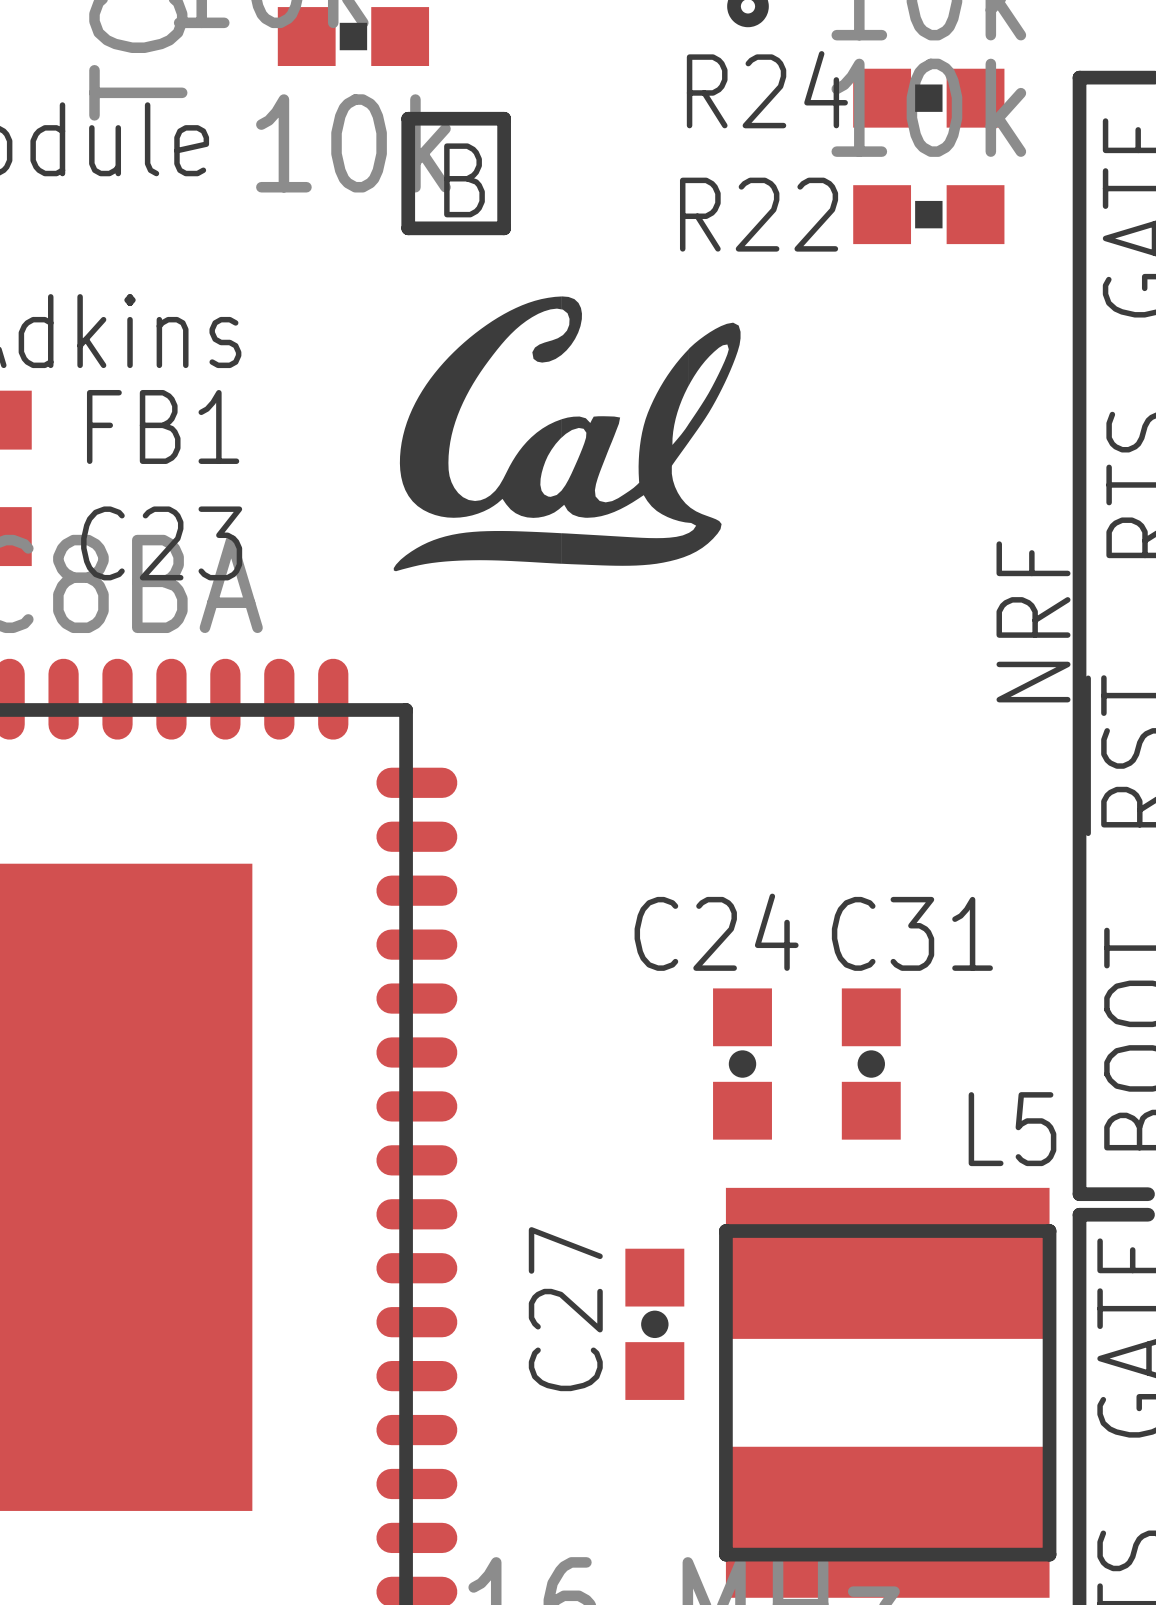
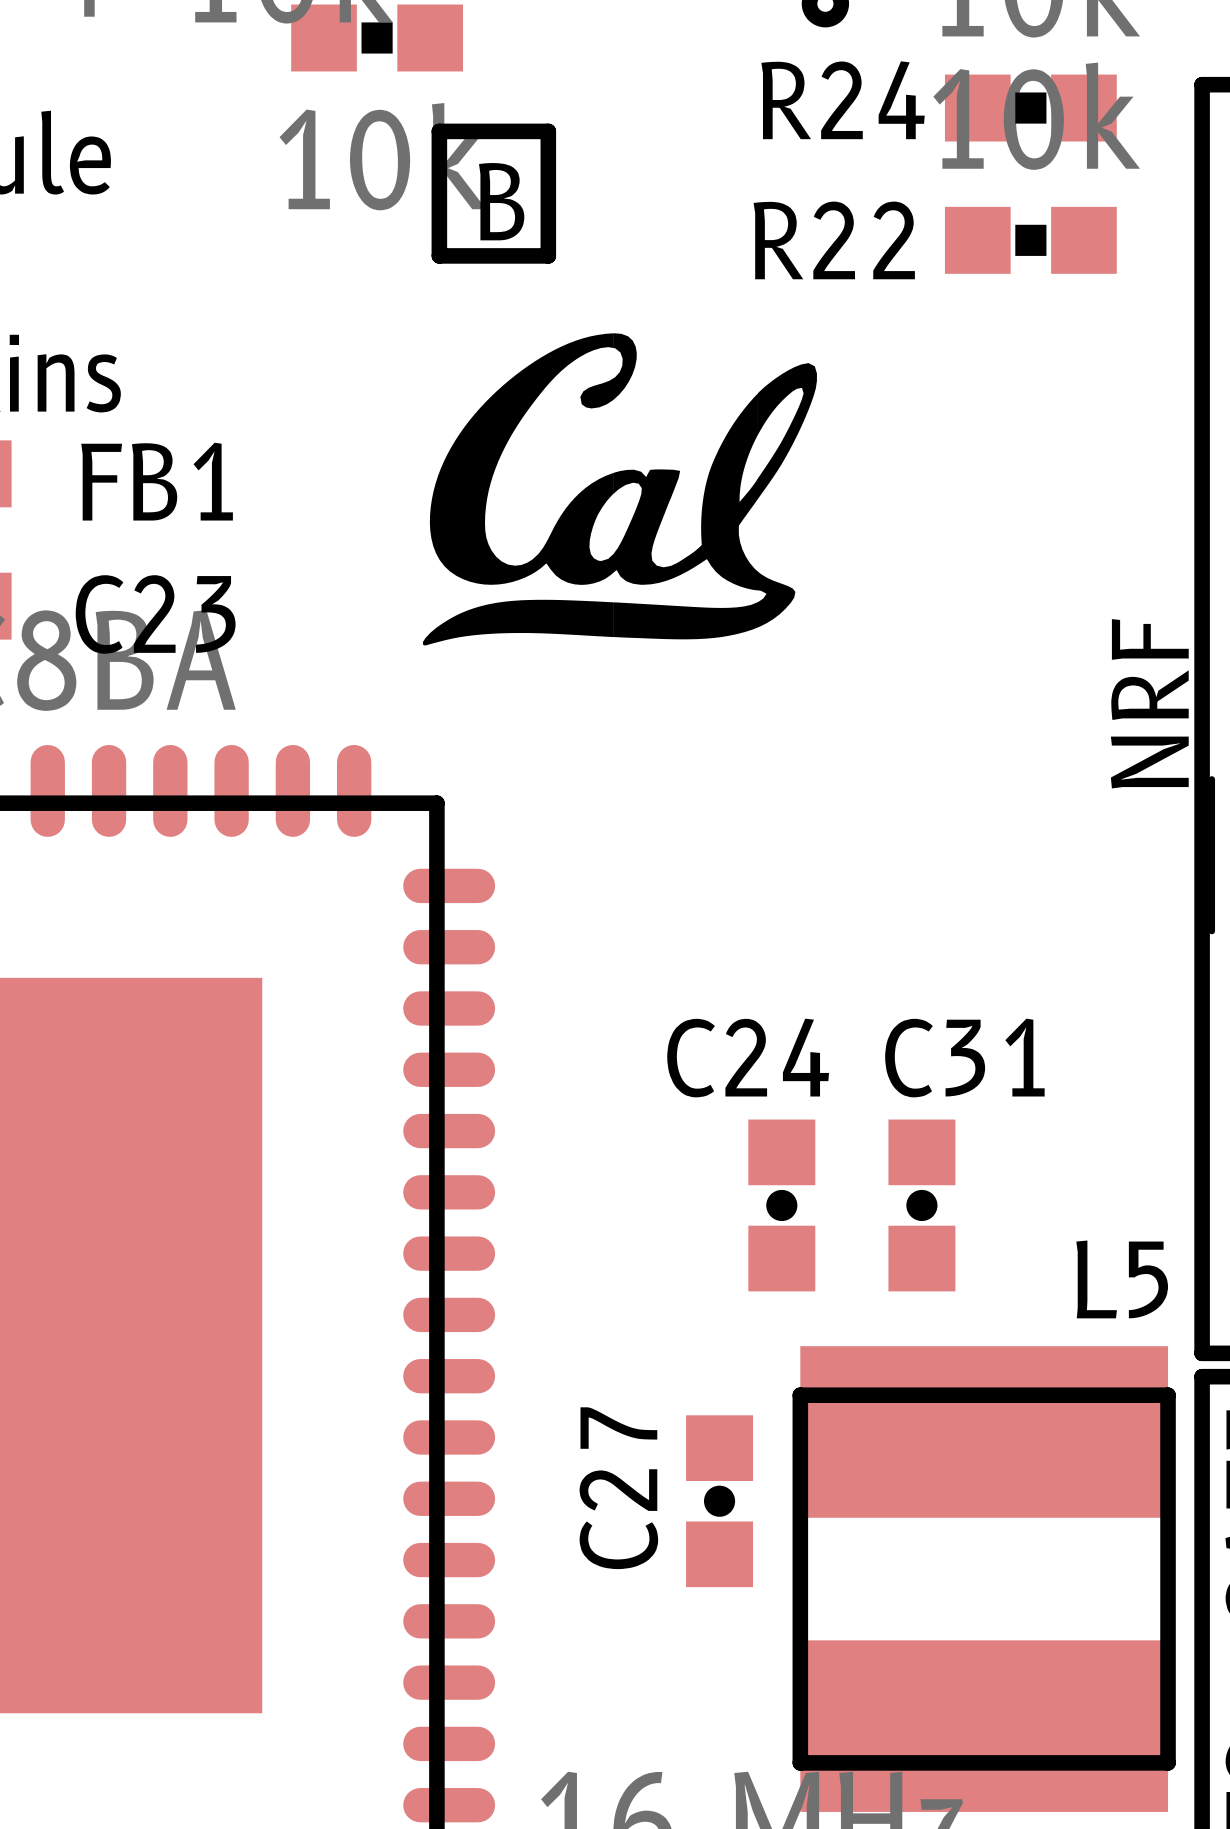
C24 position: (742, 1064) -> (781, 1205)
C31 position: (871, 1064) -> (921, 1205)

